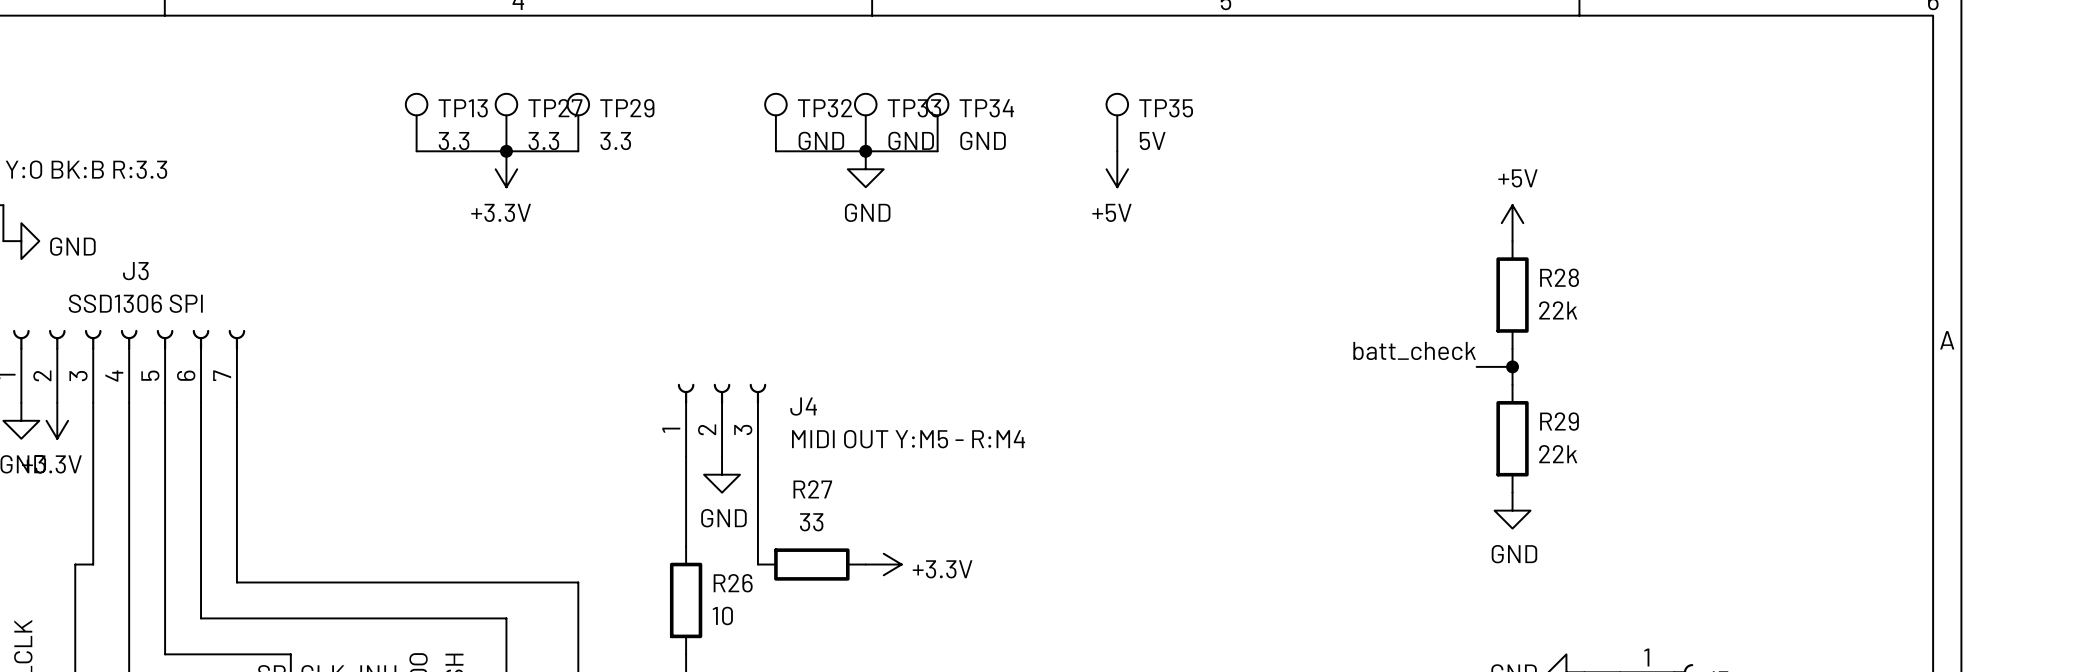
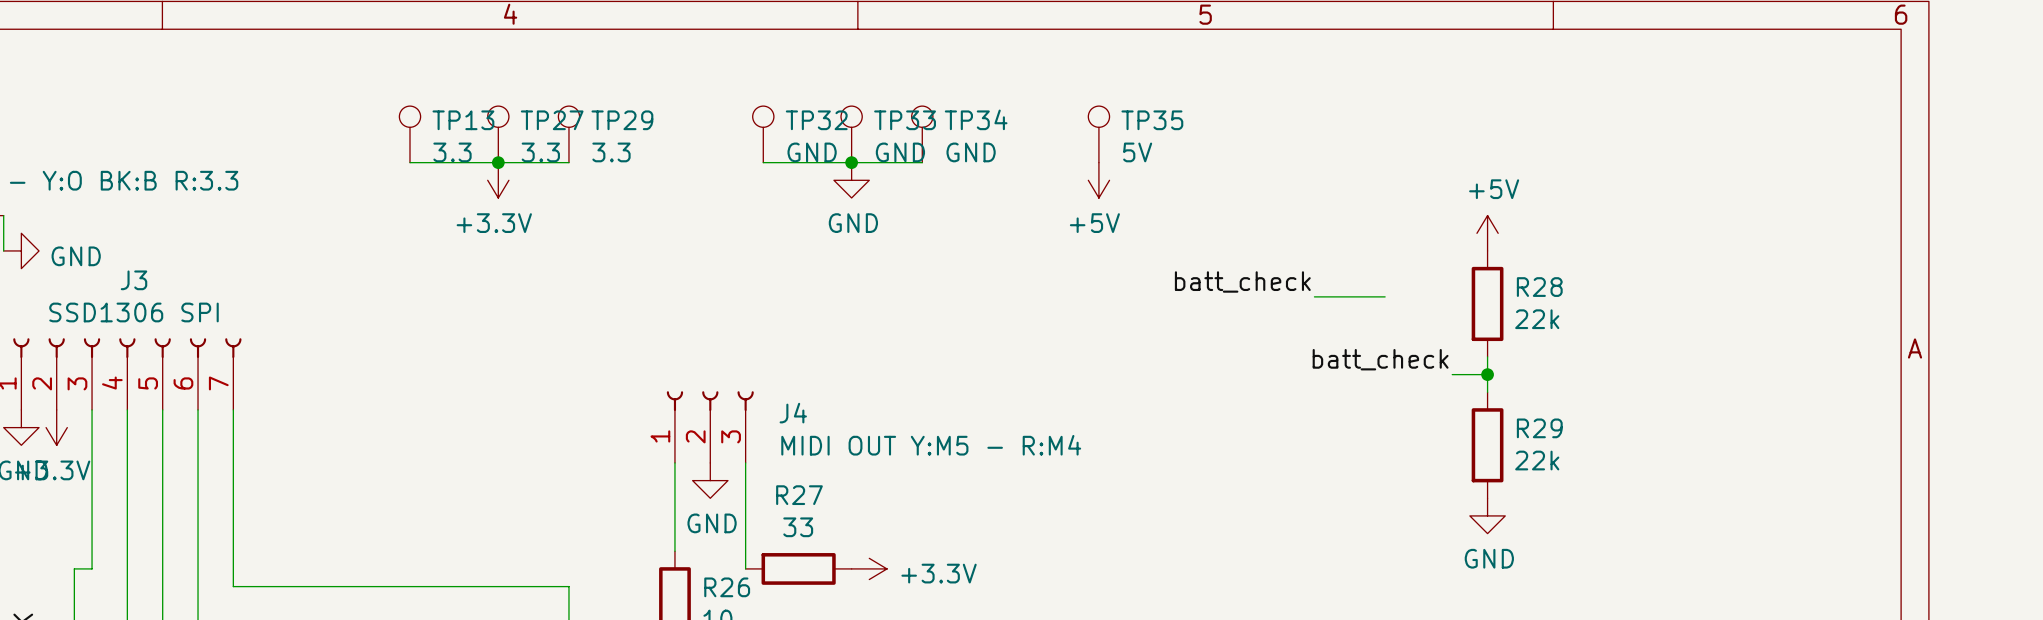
label: none -> batt_check (1242, 281)
wire: none -> (1314, 296) (1385, 296)

